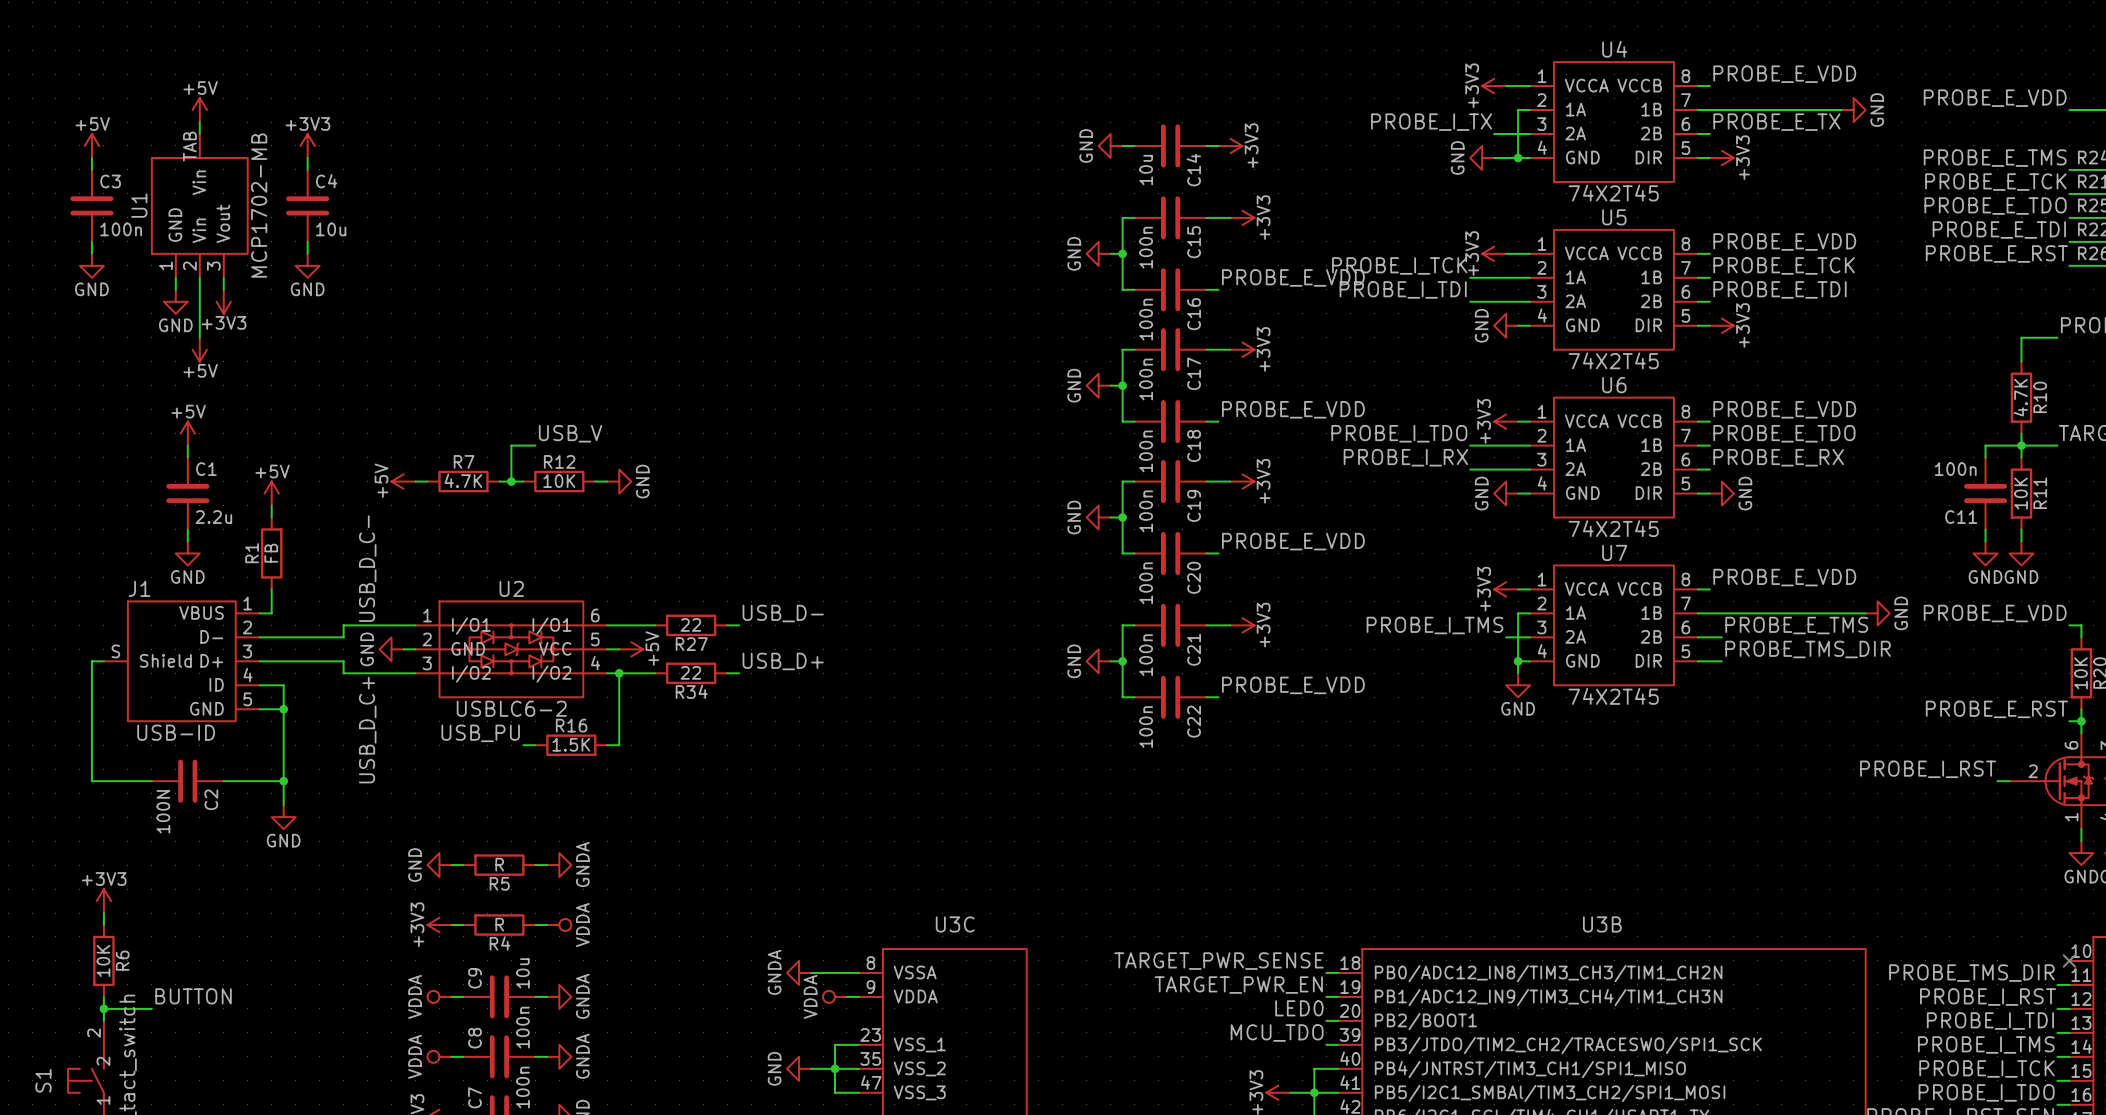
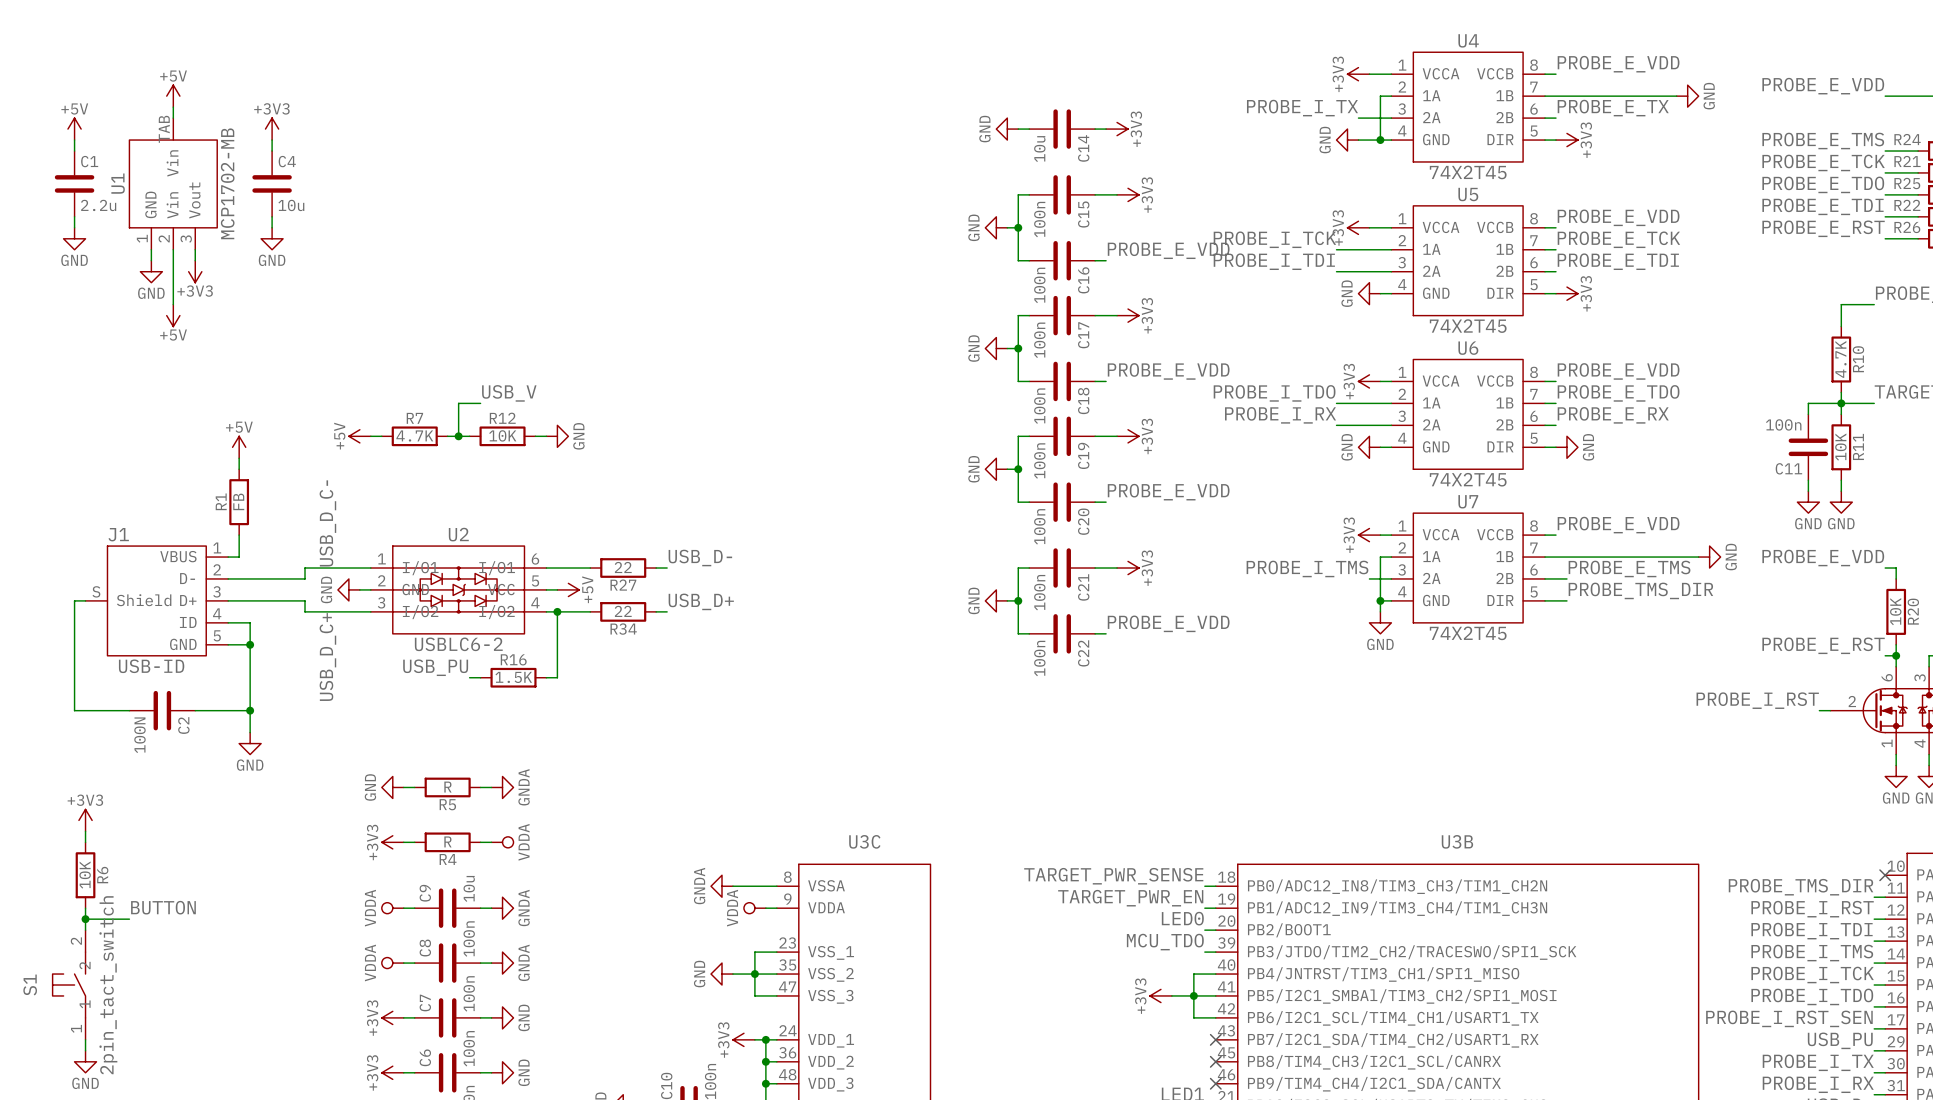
C3 name: C3 (110, 181) -> C1 (89, 161)
C3 value: 100n (121, 229) -> 2.2u (98, 205)
power symbol: +5V (187, 433) -> none
wire: (187, 445) (187, 457) -> none
C1: 2.2u (187, 493) -> none
wire: (187, 529) (187, 541) -> none
power symbol: GND (187, 553) -> none

